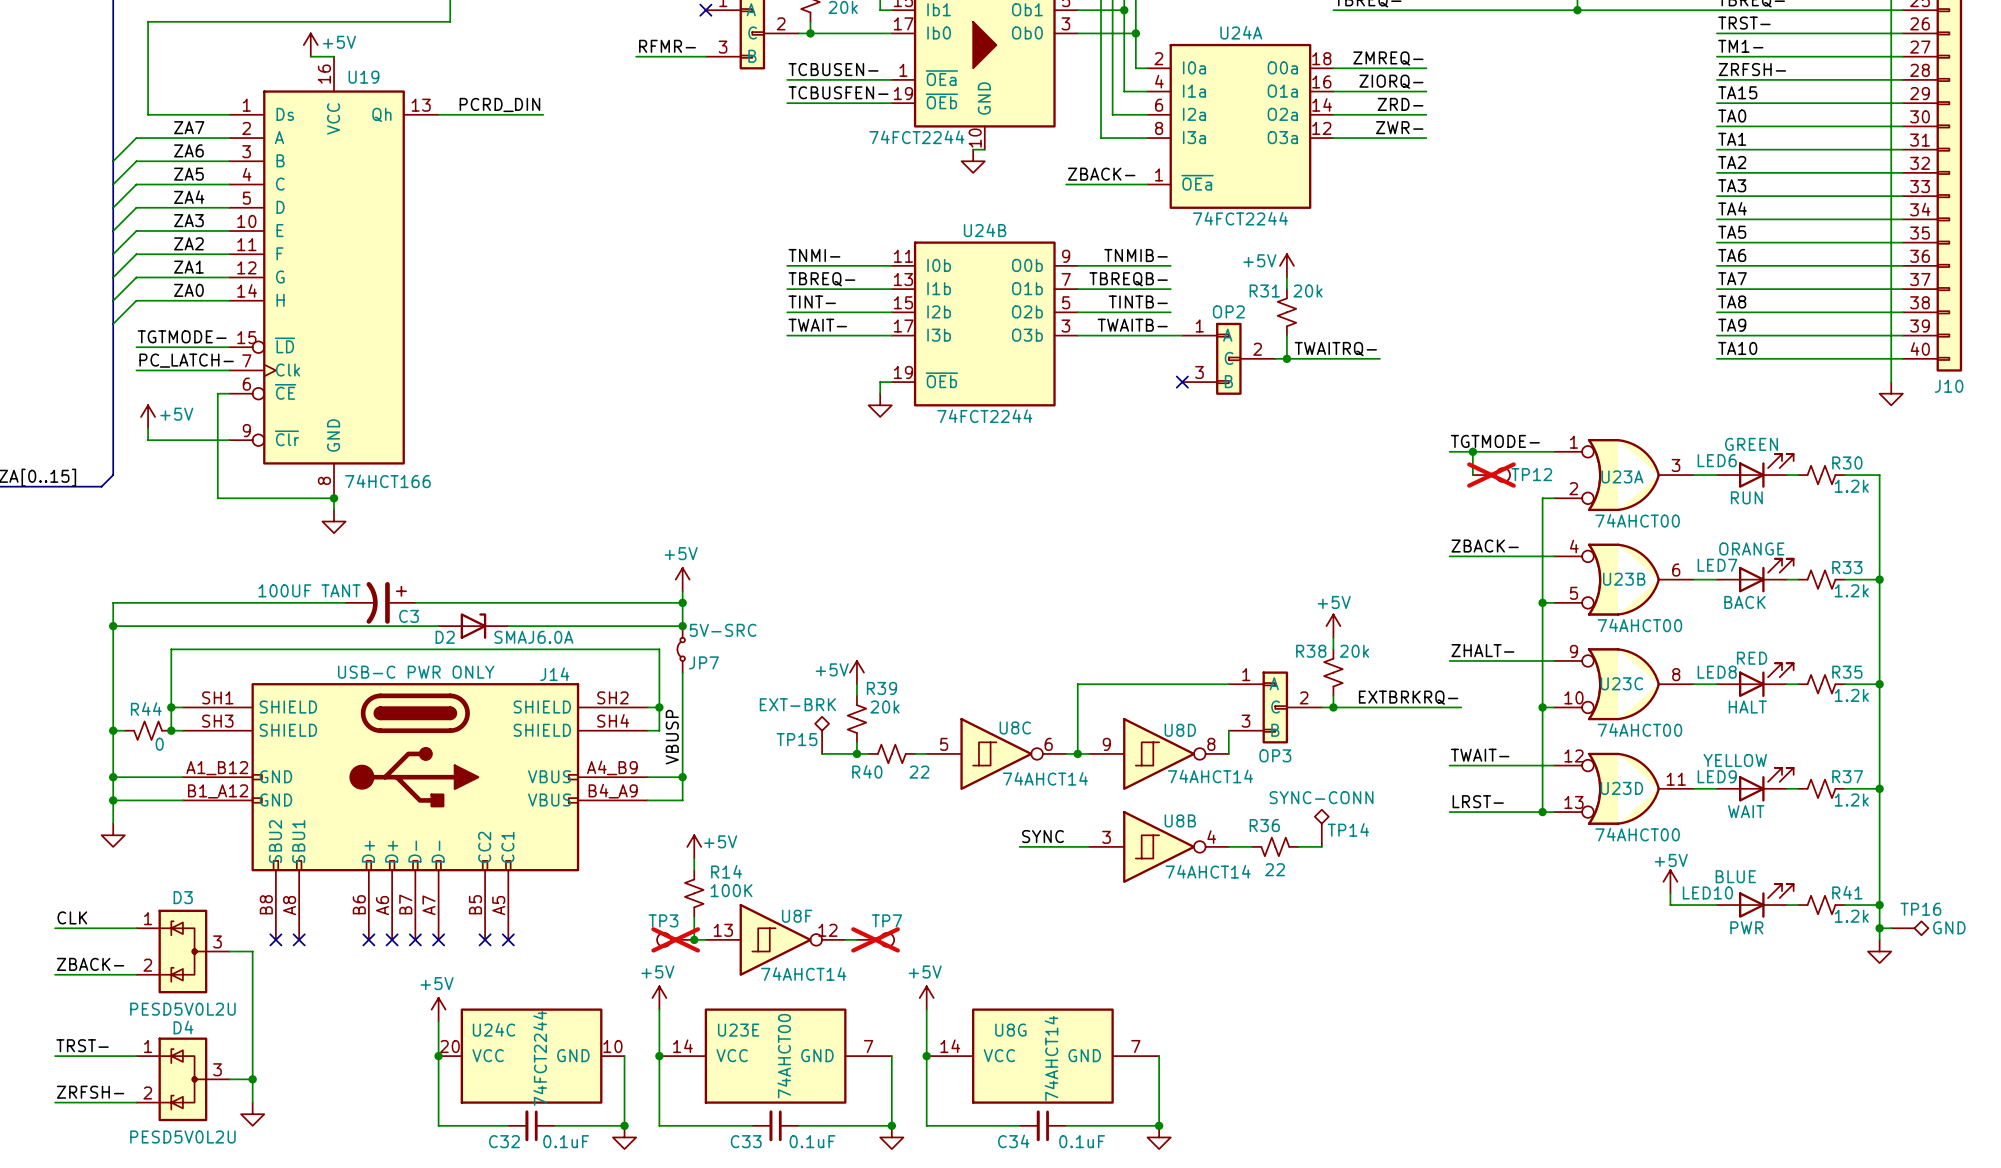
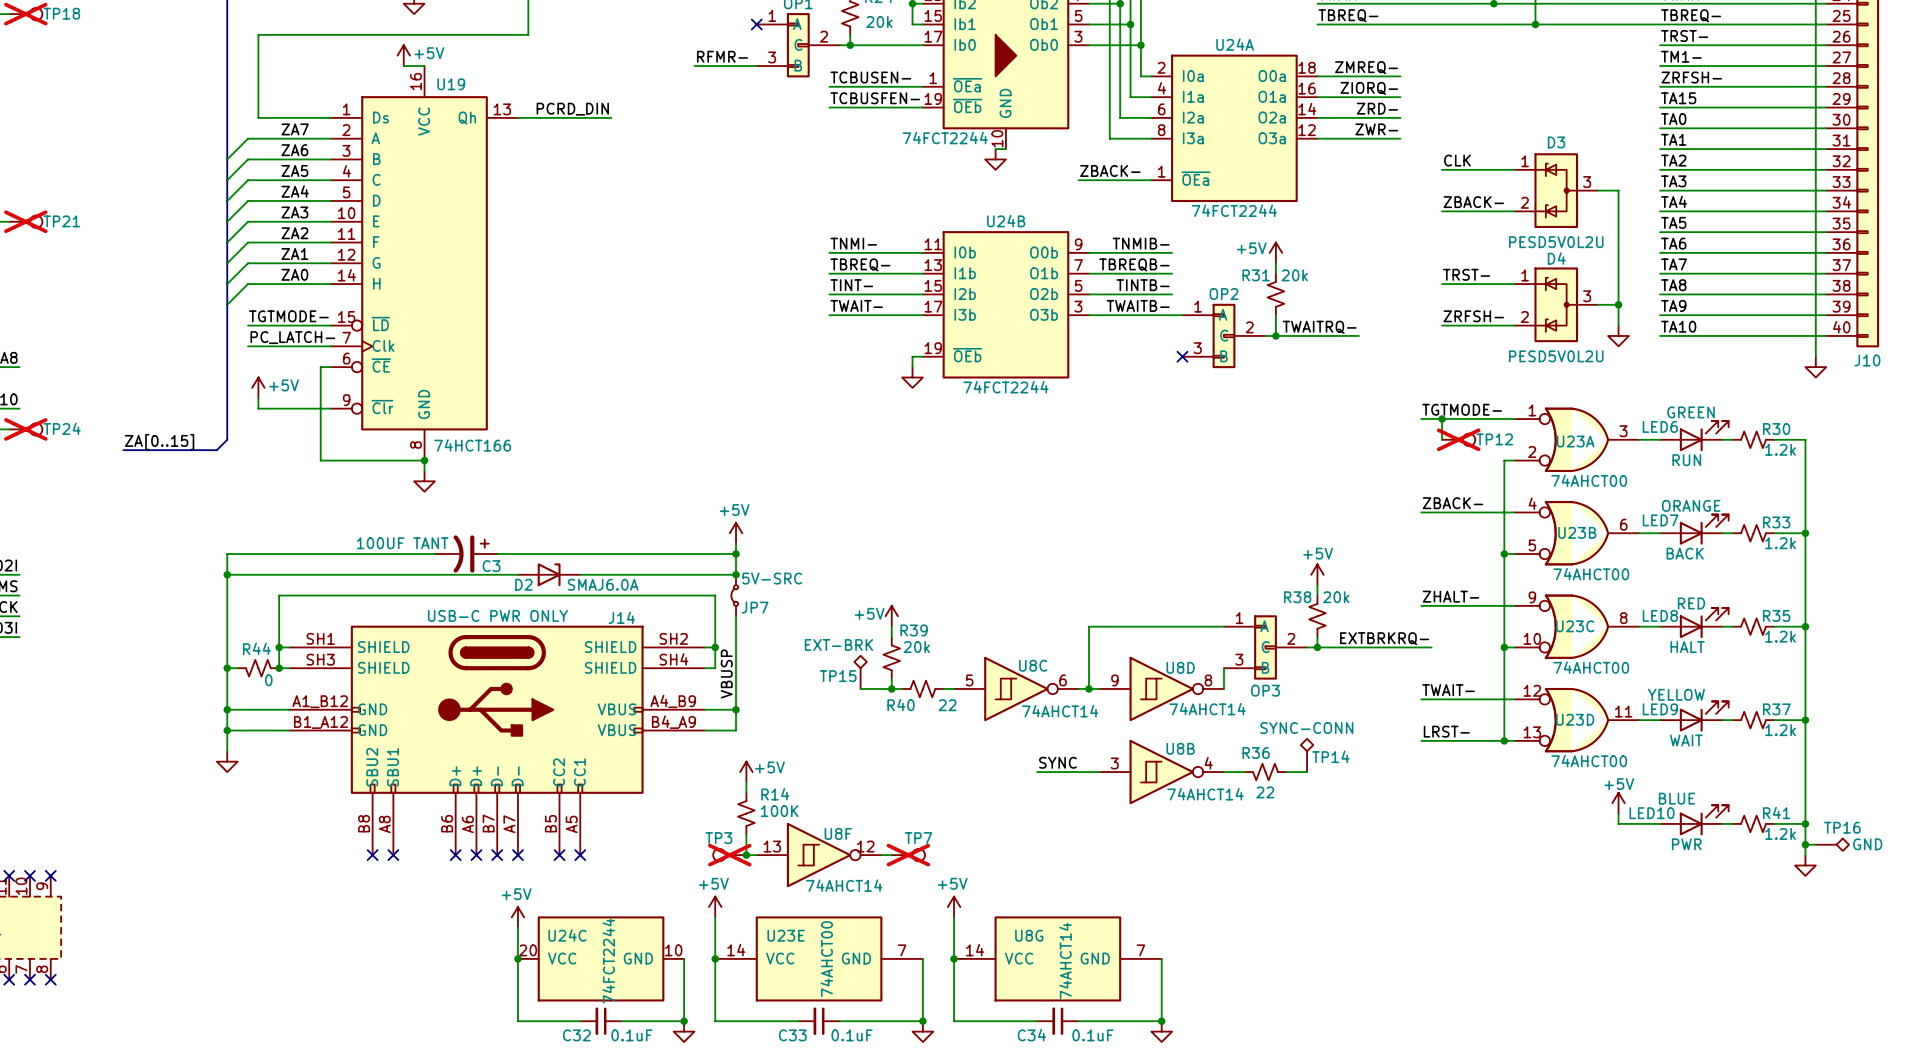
label: none -> CLK (1457, 160)
wire: none -> (1442, 169) (1514, 169)
wire: none -> (1597, 190) (1618, 190) (1618, 325)
label: none -> ZBACK- (1473, 202)
wire: none -> (1442, 211) (1514, 211)
label: none -> TRST- (1466, 274)
wire: none -> (1442, 284) (1514, 284)
wire: none -> (1597, 304) (1618, 304)
junction: none -> (1618, 304)
label: none -> ZRFSH- (1473, 316)
wire: none -> (1442, 325) (1514, 325)
power symbol: none -> (1618, 335)
label: CLK (72, 917) -> none
wire: (55, 928) (136, 928) -> none
D3 position: (182, 951) -> (1556, 190)
wire: (229, 951) (252, 951) (252, 1102) -> none
label: ZBACK- (90, 964) -> none
wire: (55, 974) (136, 974) -> none
label: TRST- (82, 1045) -> none
wire: (55, 1056) (136, 1056) -> none
D4 position: (182, 1079) -> (1556, 304)
wire: (229, 1079) (252, 1079) -> none
junction: (252, 1079) -> none
label: ZRFSH- (90, 1092) -> none
wire: (55, 1102) (136, 1102) -> none
power symbol: (252, 1114) -> none

